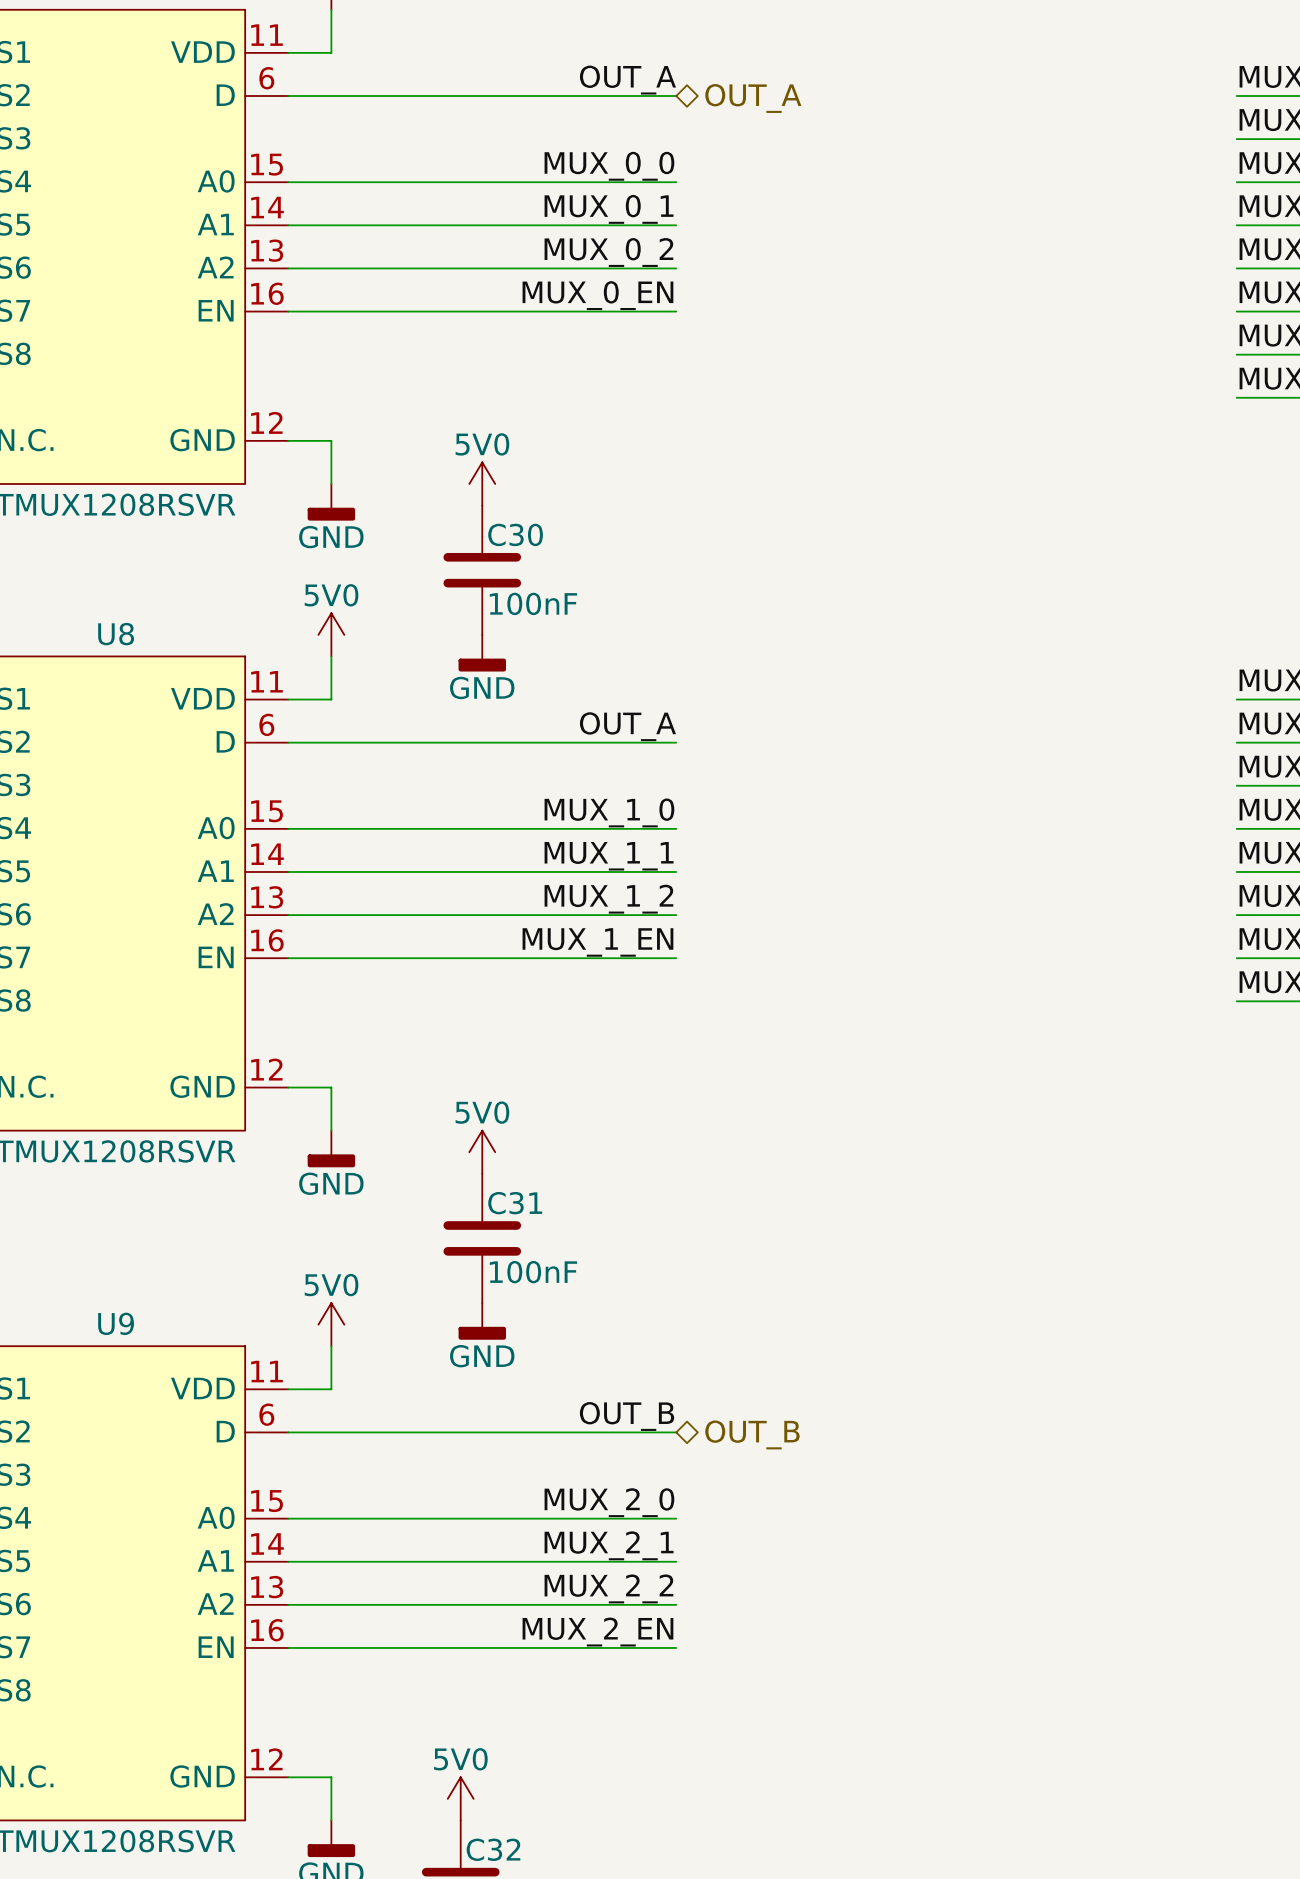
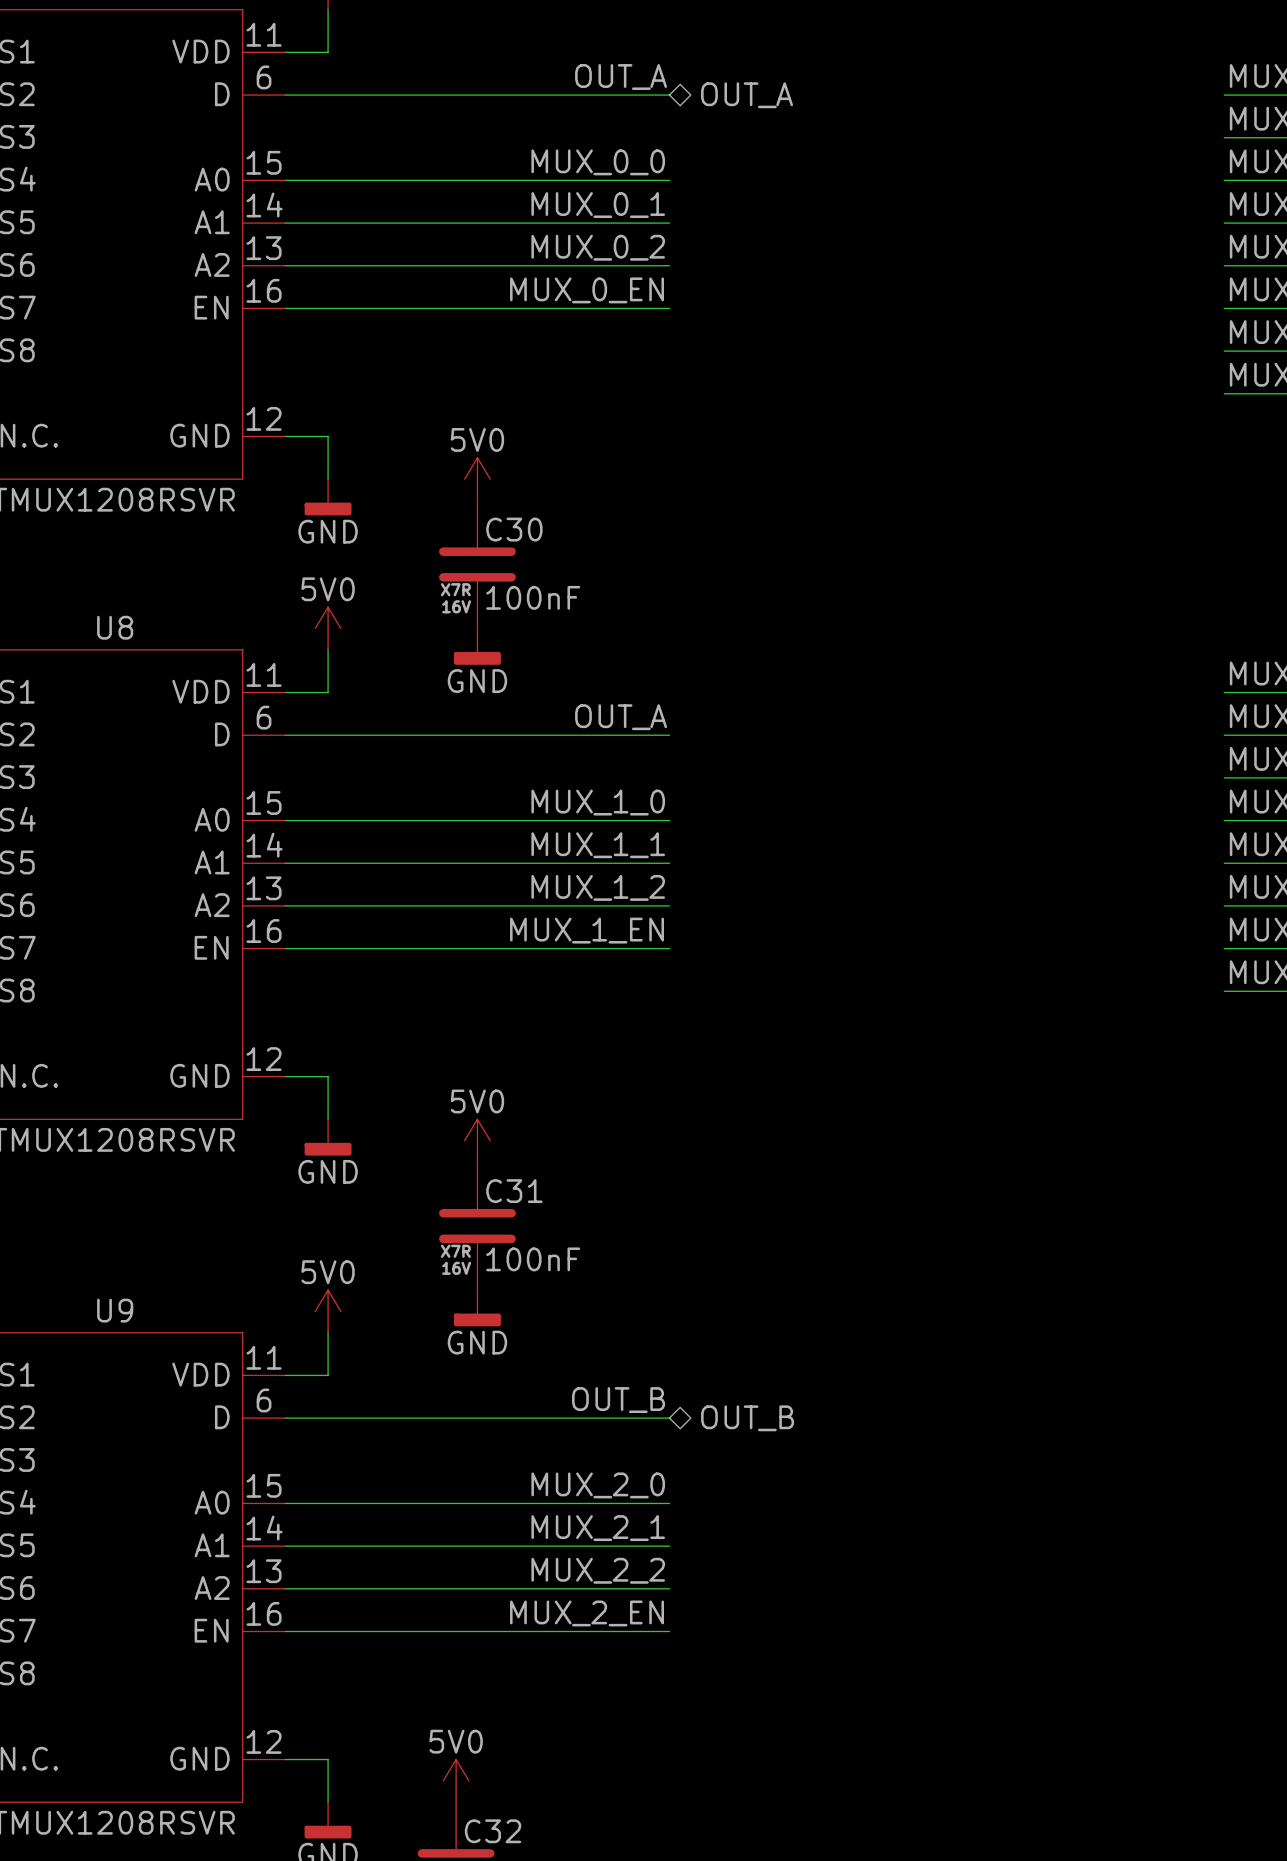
C30 text: none -> X7R (455, 589)
C30 text: none -> 16V (456, 606)
C31 text: none -> X7R (455, 1251)
C31 text: none -> 16V (456, 1268)

